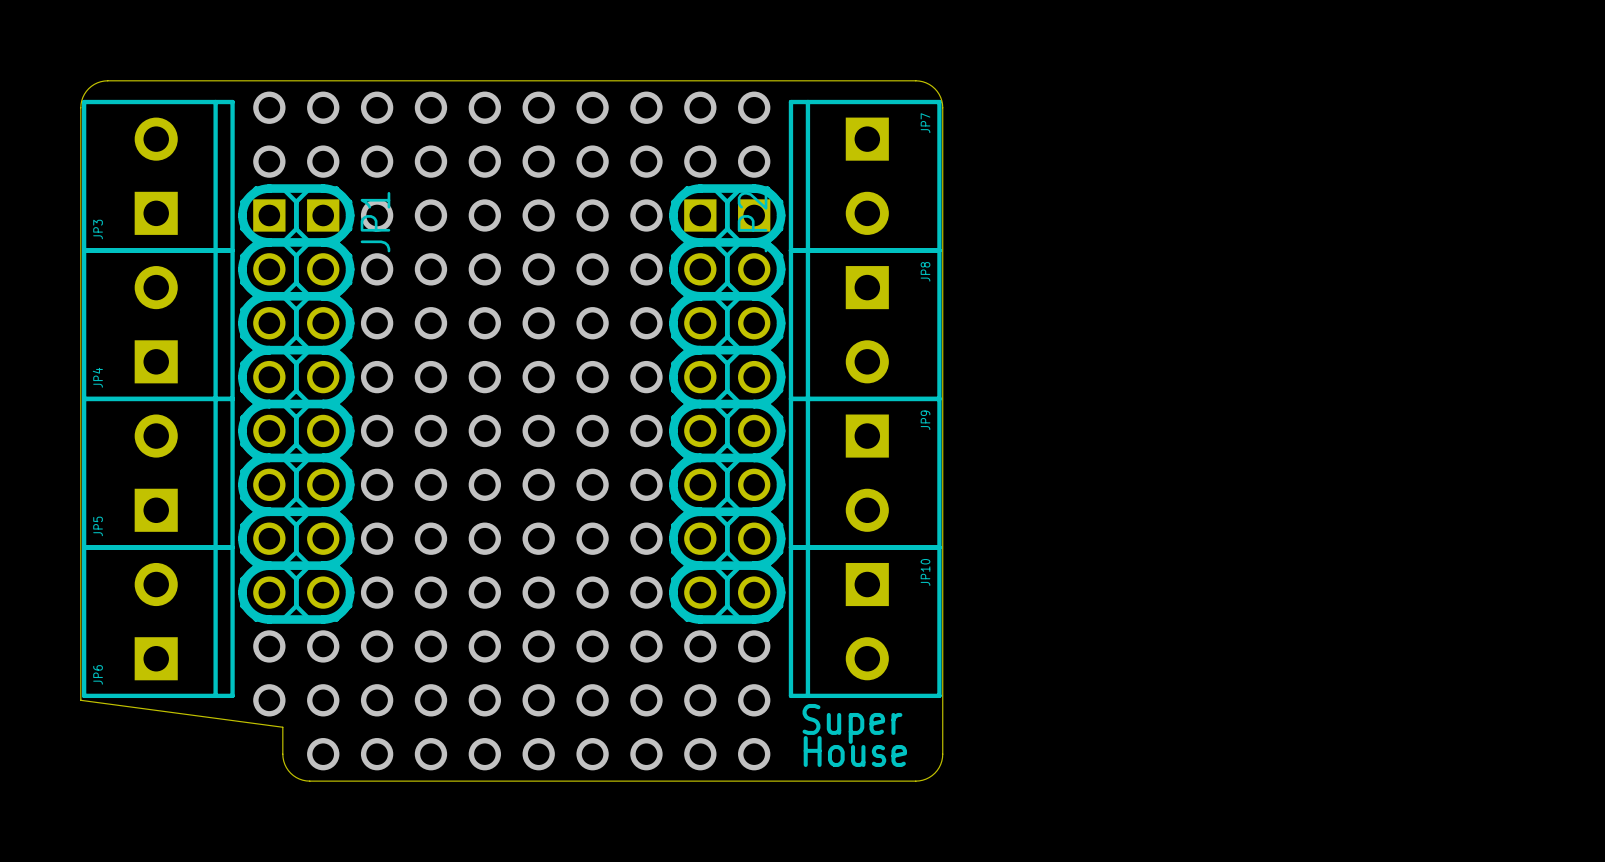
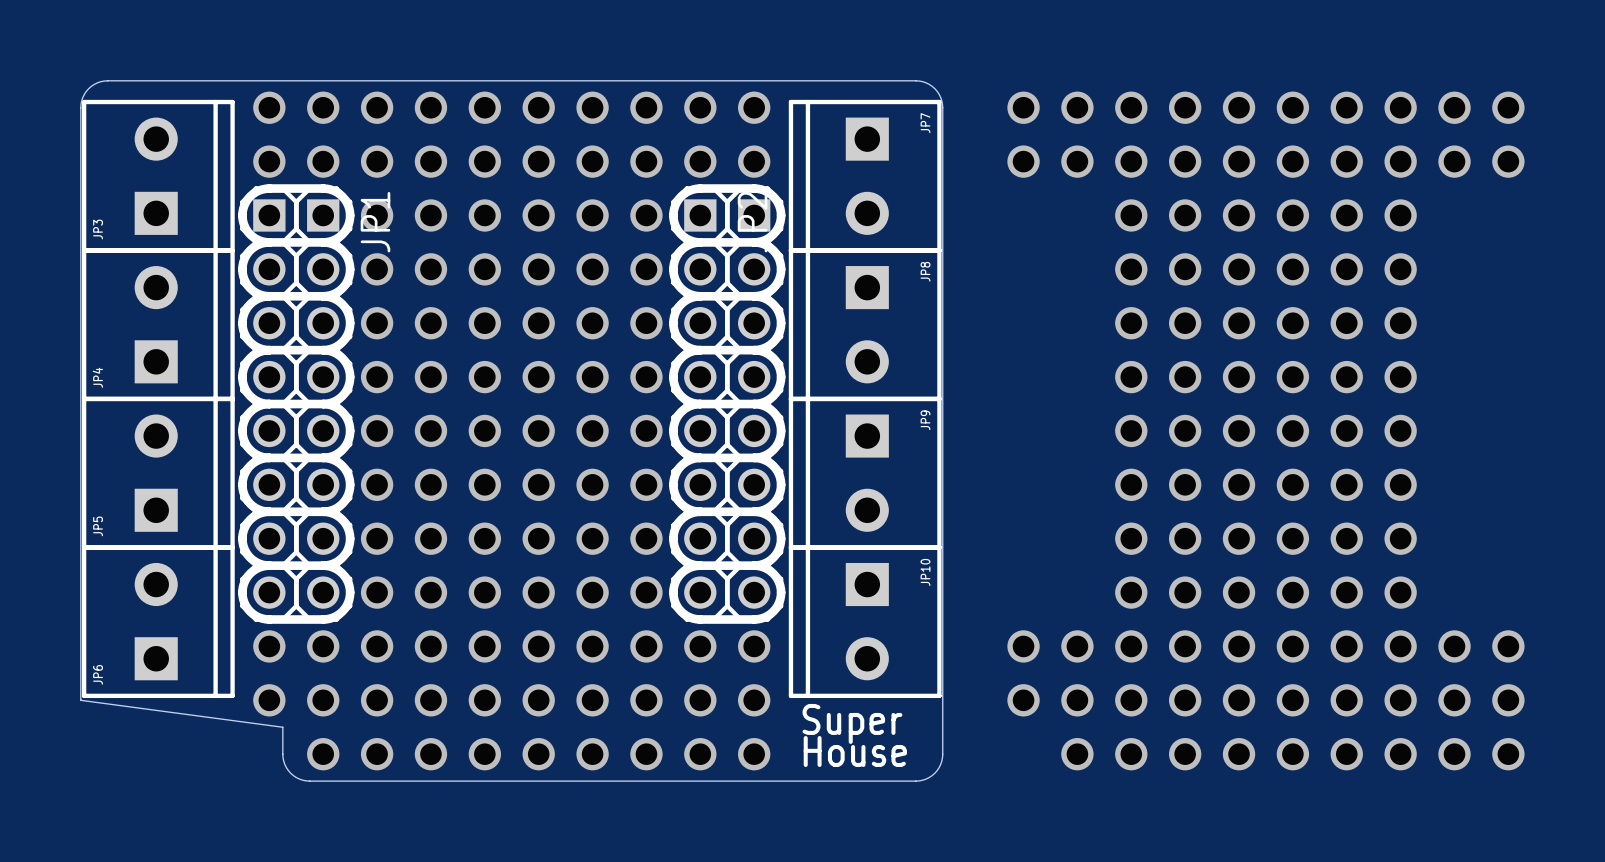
via: none -> (1023, 107)
via: none -> (1077, 107)
via: none -> (1131, 107)
via: none -> (1185, 107)
via: none -> (1239, 107)
via: none -> (1292, 107)
via: none -> (1346, 107)
via: none -> (1400, 107)
via: none -> (1454, 107)
via: none -> (1508, 107)
via: none -> (1023, 161)
via: none -> (1077, 161)
via: none -> (1131, 161)
via: none -> (1185, 161)
via: none -> (1239, 161)
via: none -> (1292, 161)
via: none -> (1346, 161)
via: none -> (1400, 161)
via: none -> (1454, 161)
via: none -> (1508, 161)
via: none -> (1131, 215)
via: none -> (1185, 215)
via: none -> (1239, 215)
via: none -> (1292, 215)
via: none -> (1346, 215)
via: none -> (1400, 215)
via: none -> (1131, 269)
via: none -> (1185, 269)
via: none -> (1239, 269)
via: none -> (1292, 269)
via: none -> (1346, 269)
via: none -> (1400, 269)
via: none -> (1131, 323)
via: none -> (1185, 323)
via: none -> (1239, 323)
via: none -> (1292, 323)
via: none -> (1346, 323)
via: none -> (1400, 323)
via: none -> (1131, 377)
via: none -> (1185, 377)
via: none -> (1239, 377)
via: none -> (1292, 377)
via: none -> (1346, 377)
via: none -> (1400, 377)
via: none -> (1131, 430)
via: none -> (1185, 430)
via: none -> (1239, 430)
via: none -> (1292, 430)
via: none -> (1346, 430)
via: none -> (1400, 430)
via: none -> (1131, 484)
via: none -> (1185, 484)
via: none -> (1239, 484)
via: none -> (1292, 484)
via: none -> (1346, 484)
via: none -> (1400, 484)
via: none -> (1131, 538)
via: none -> (1185, 538)
via: none -> (1239, 538)
via: none -> (1292, 538)
via: none -> (1346, 538)
via: none -> (1400, 538)
via: none -> (1131, 592)
via: none -> (1185, 592)
via: none -> (1239, 592)
via: none -> (1292, 592)
via: none -> (1346, 592)
via: none -> (1400, 592)
via: none -> (1023, 646)
via: none -> (1077, 646)
via: none -> (1131, 646)
via: none -> (1185, 646)
via: none -> (1239, 646)
via: none -> (1292, 646)
via: none -> (1346, 646)
via: none -> (1400, 646)
via: none -> (1454, 646)
via: none -> (1508, 646)
via: none -> (1023, 700)
via: none -> (1077, 700)
via: none -> (1131, 700)
via: none -> (1185, 700)
via: none -> (1239, 700)
via: none -> (1292, 700)
via: none -> (1346, 700)
via: none -> (1400, 700)
via: none -> (1454, 700)
via: none -> (1508, 700)
via: none -> (1077, 754)
via: none -> (1131, 754)
via: none -> (1185, 754)
via: none -> (1239, 754)
via: none -> (1292, 754)
via: none -> (1346, 754)
via: none -> (1400, 754)
via: none -> (1454, 754)
via: none -> (1508, 754)

